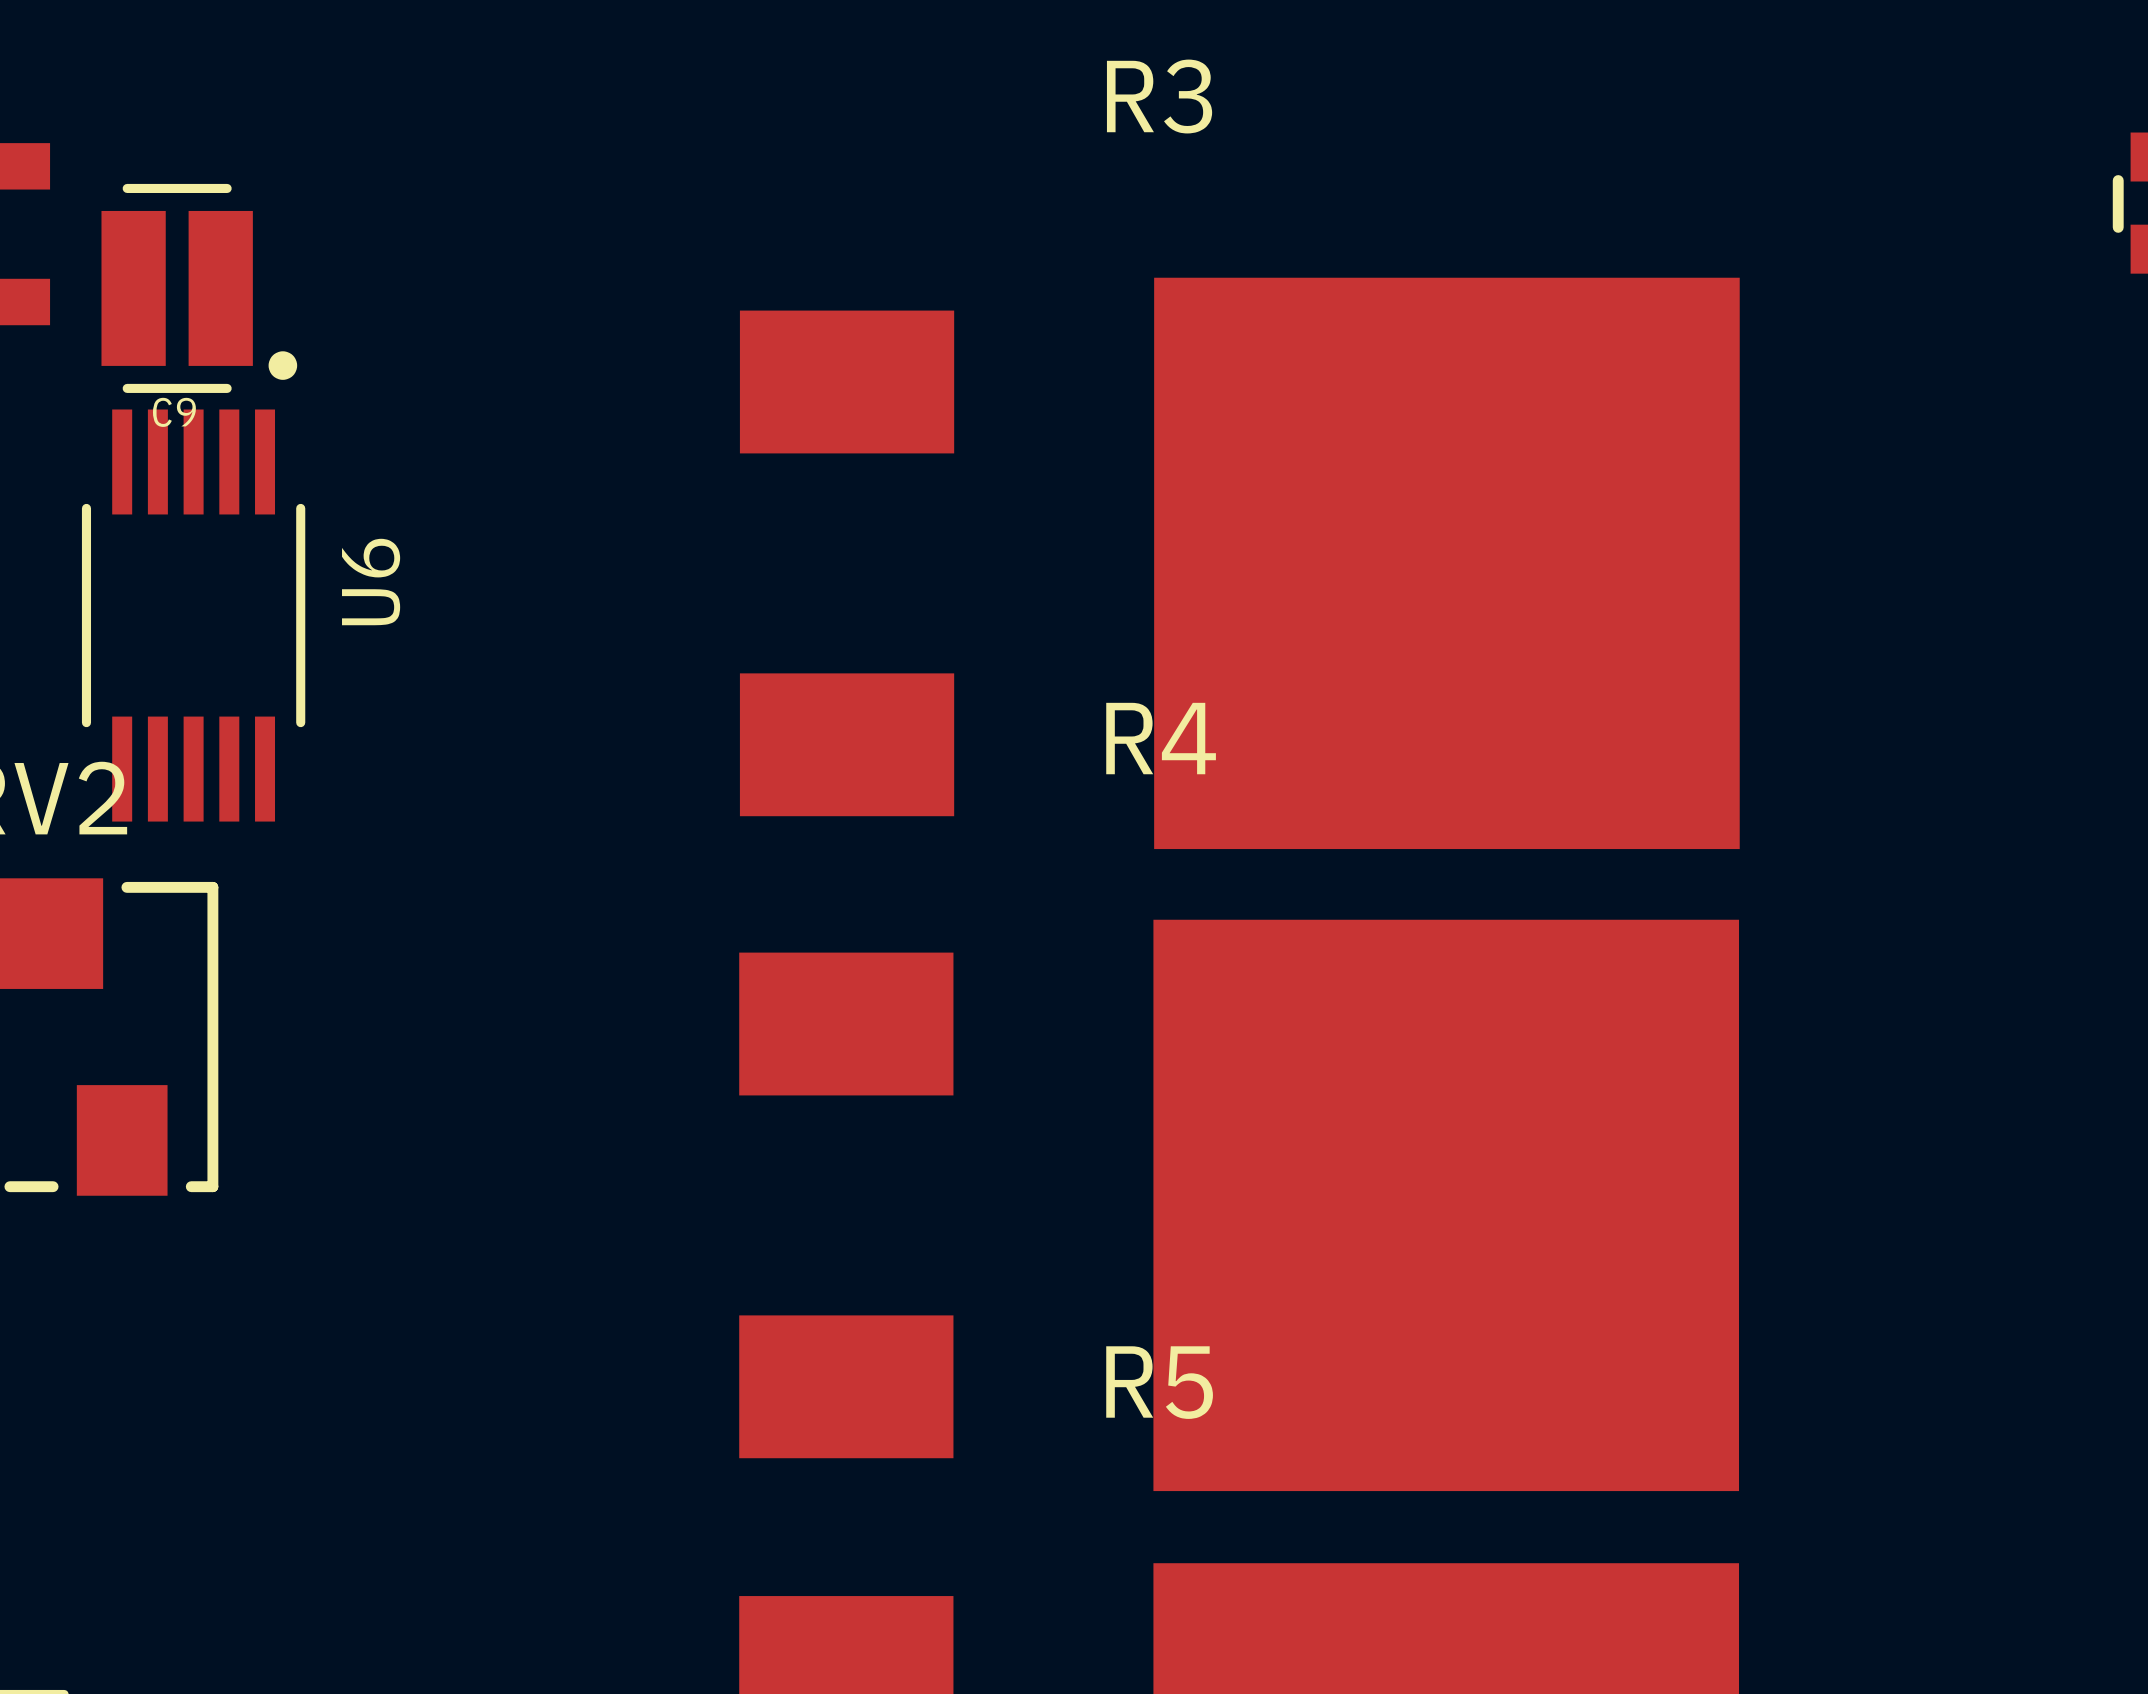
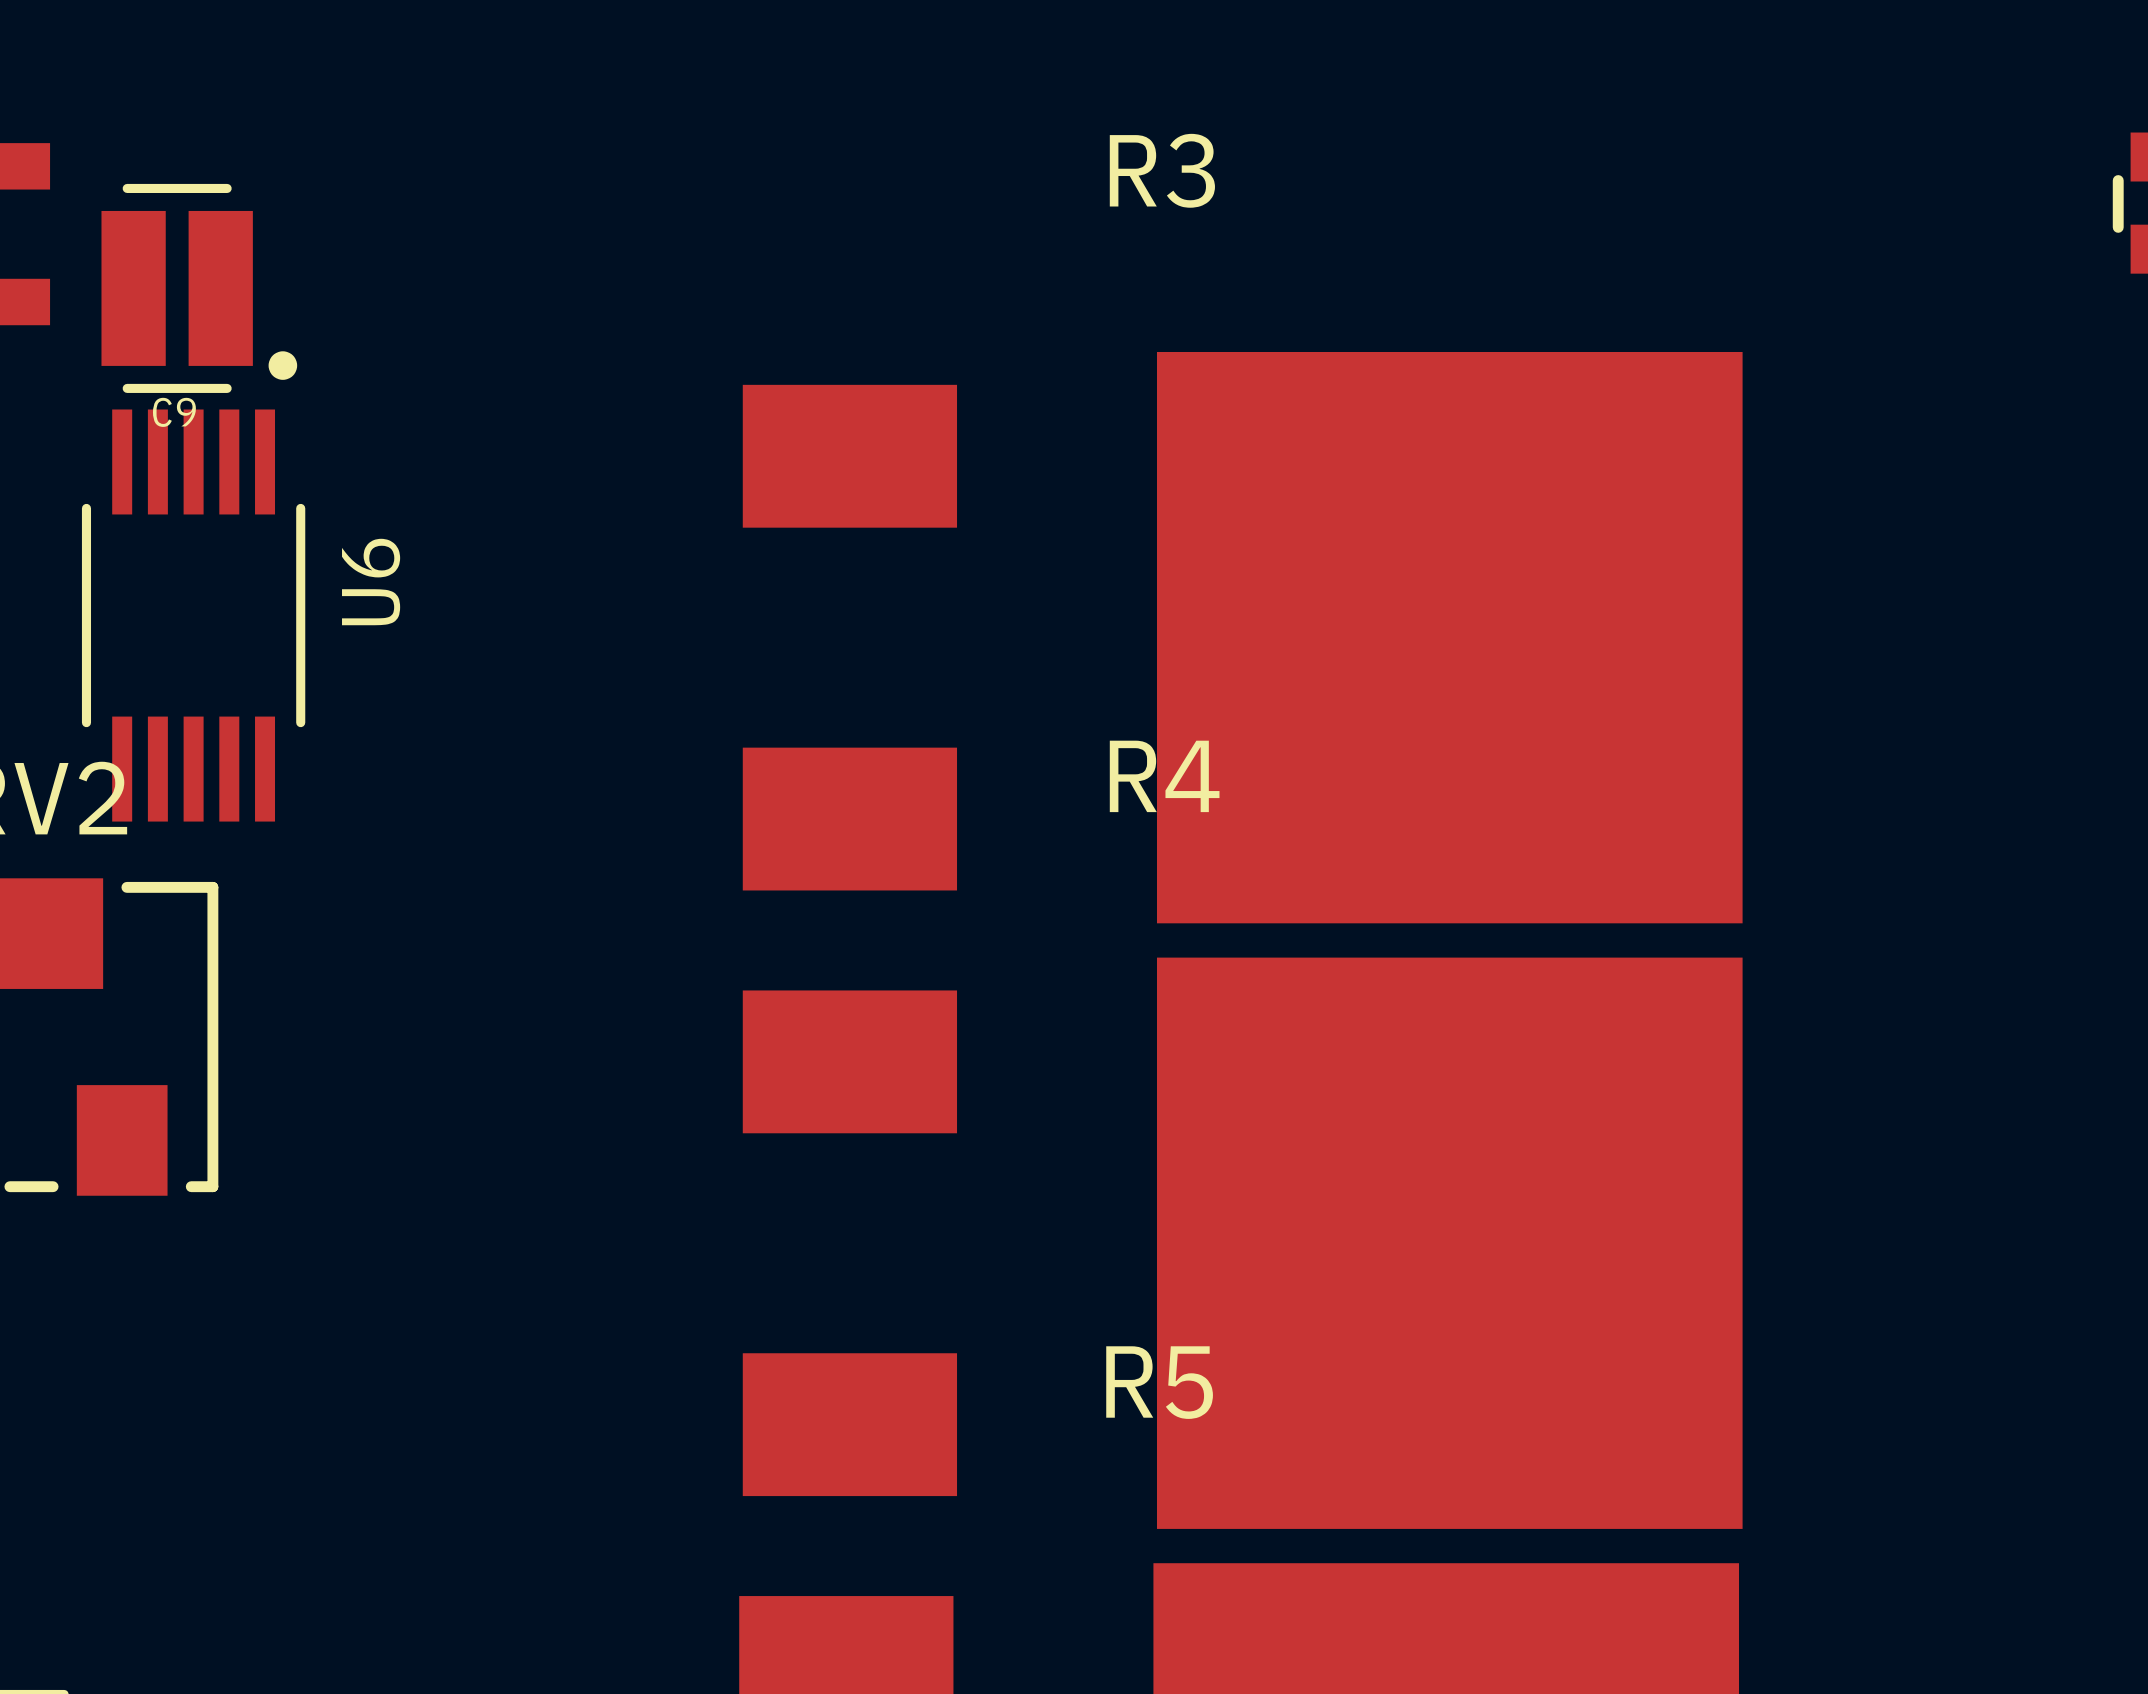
R3 position: (1239, 563) -> (1242, 637)
R4 position: (1239, 1205) -> (1242, 1243)

